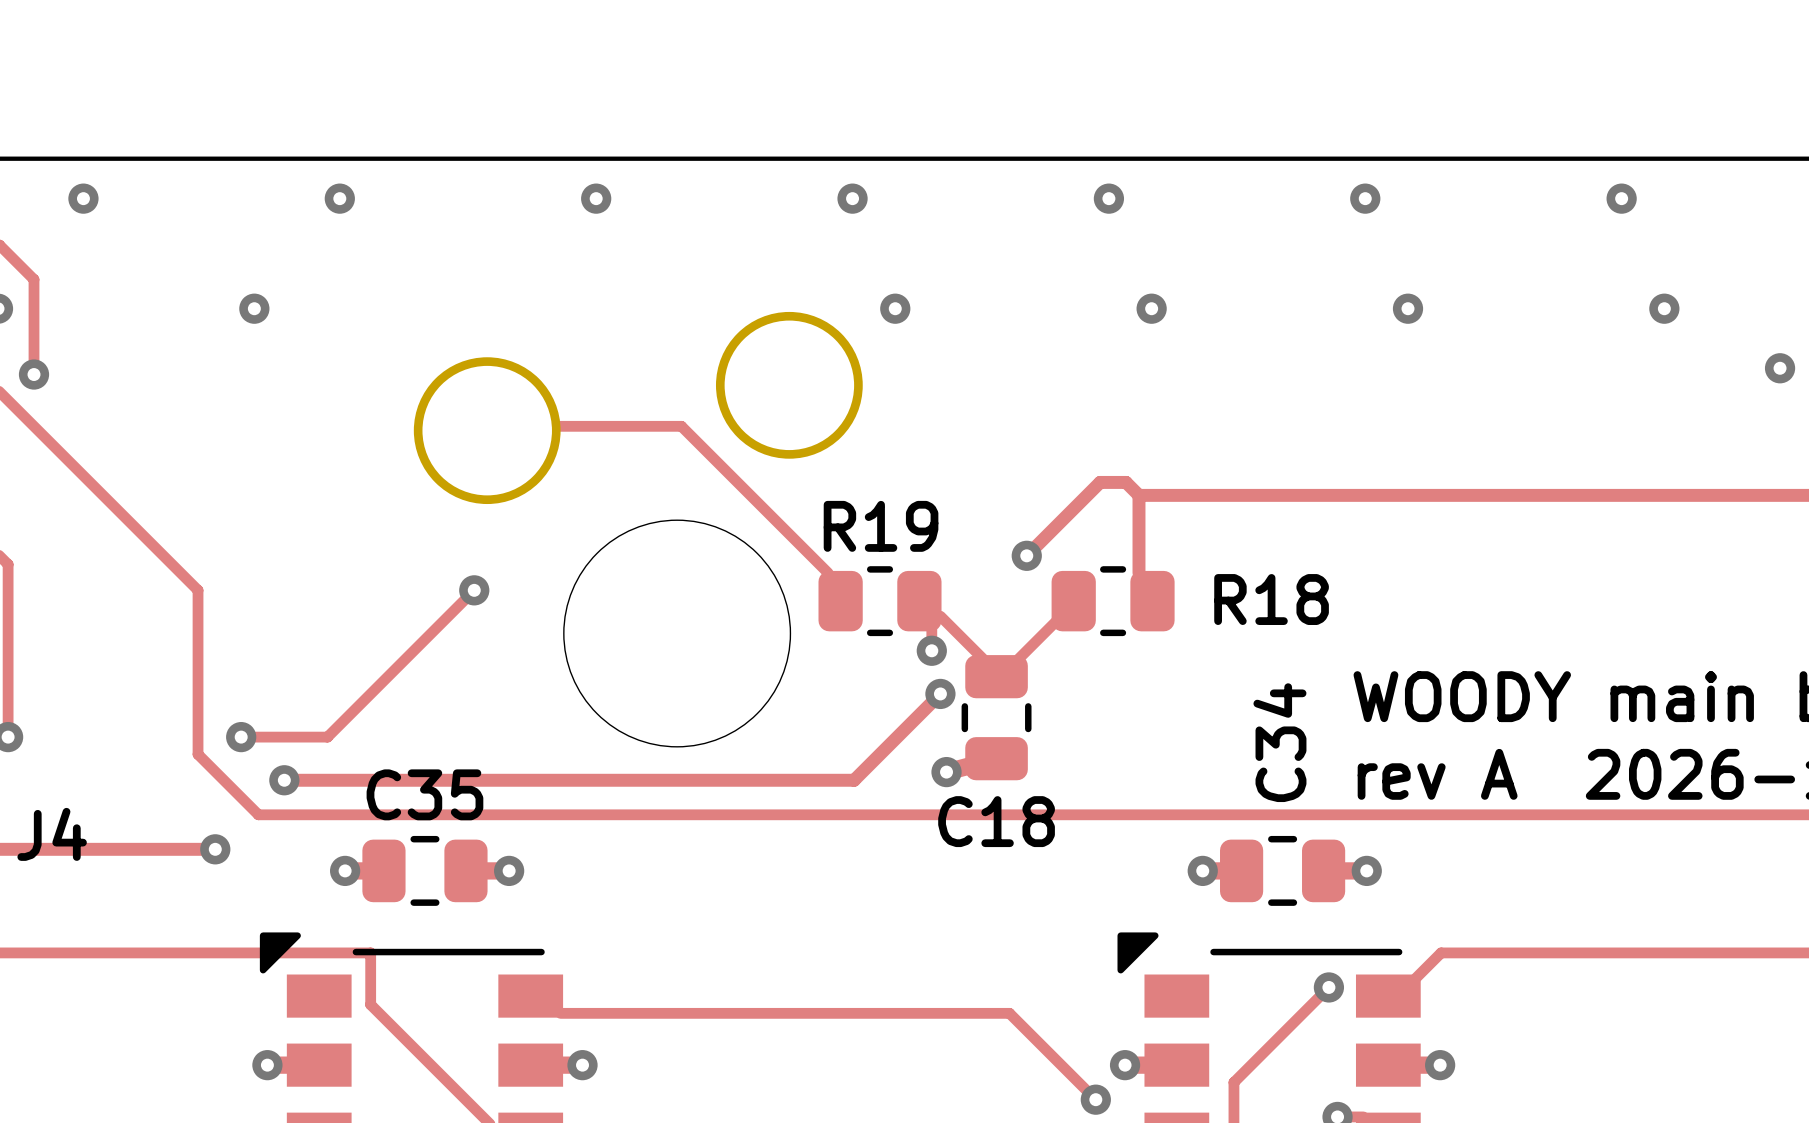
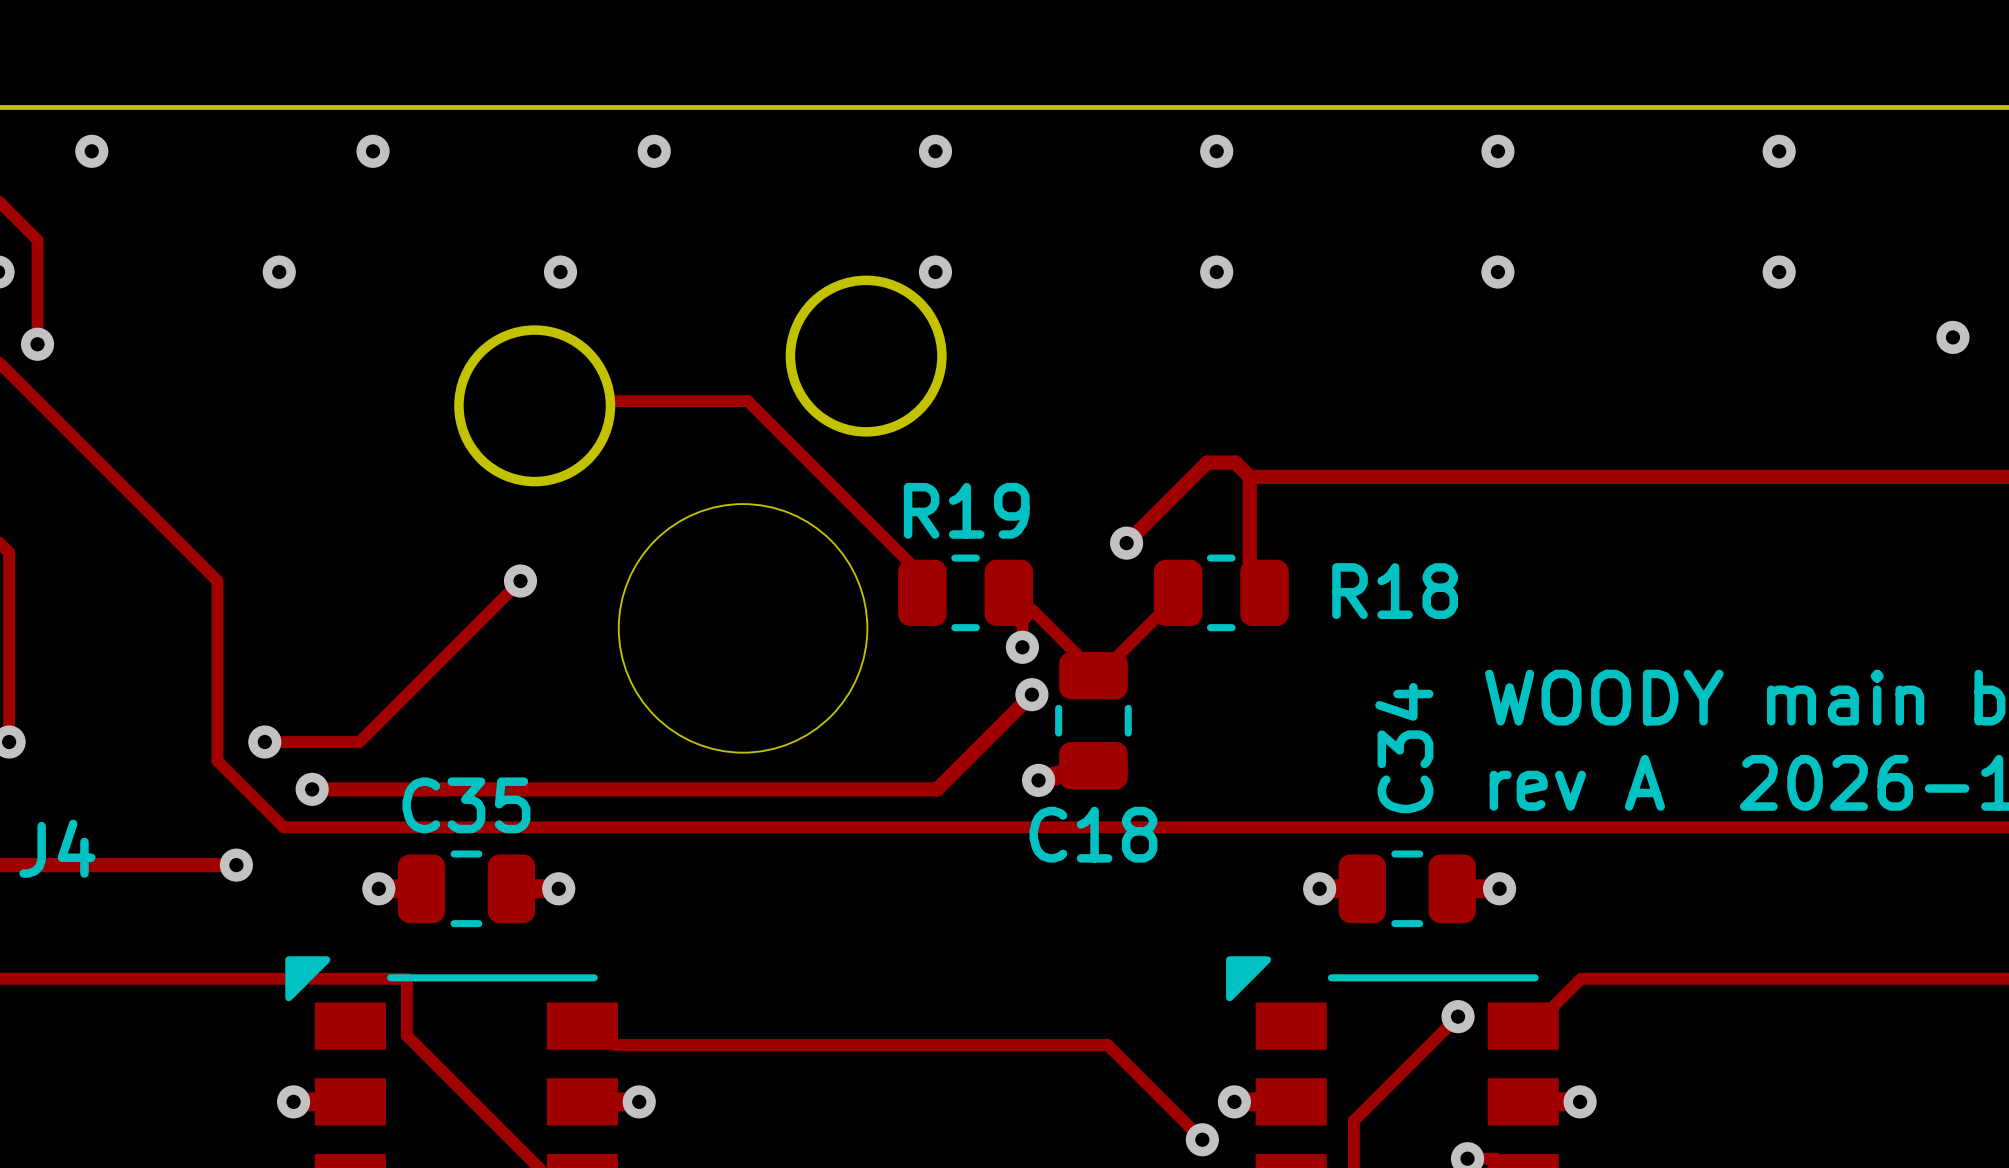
via: none -> (560, 272)
via position: (895, 308) -> (935, 272)
via position: (1151, 308) -> (1216, 272)
via position: (1408, 308) -> (1497, 272)
via position: (1664, 308) -> (1779, 272)

